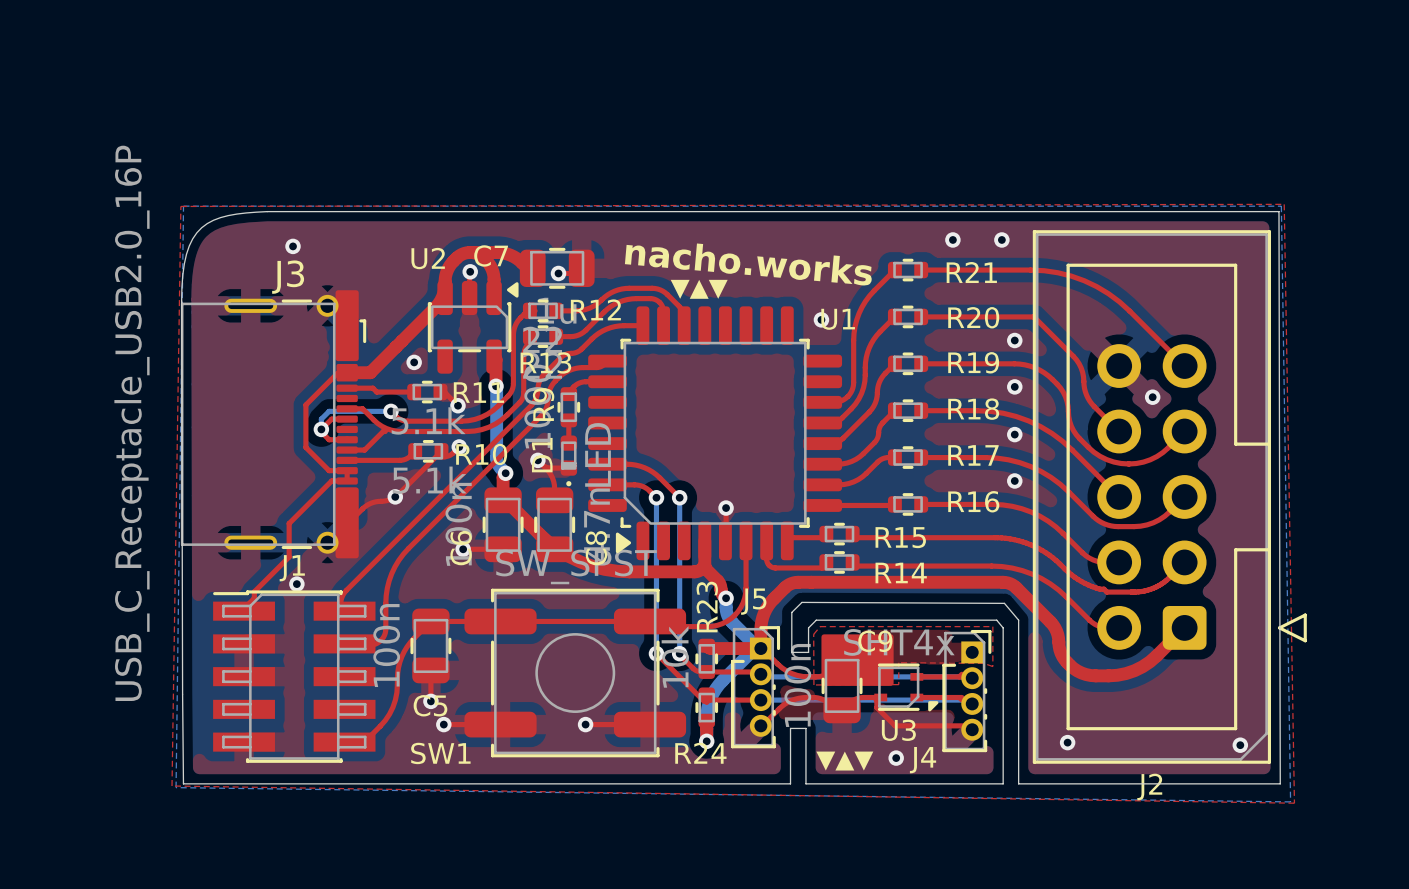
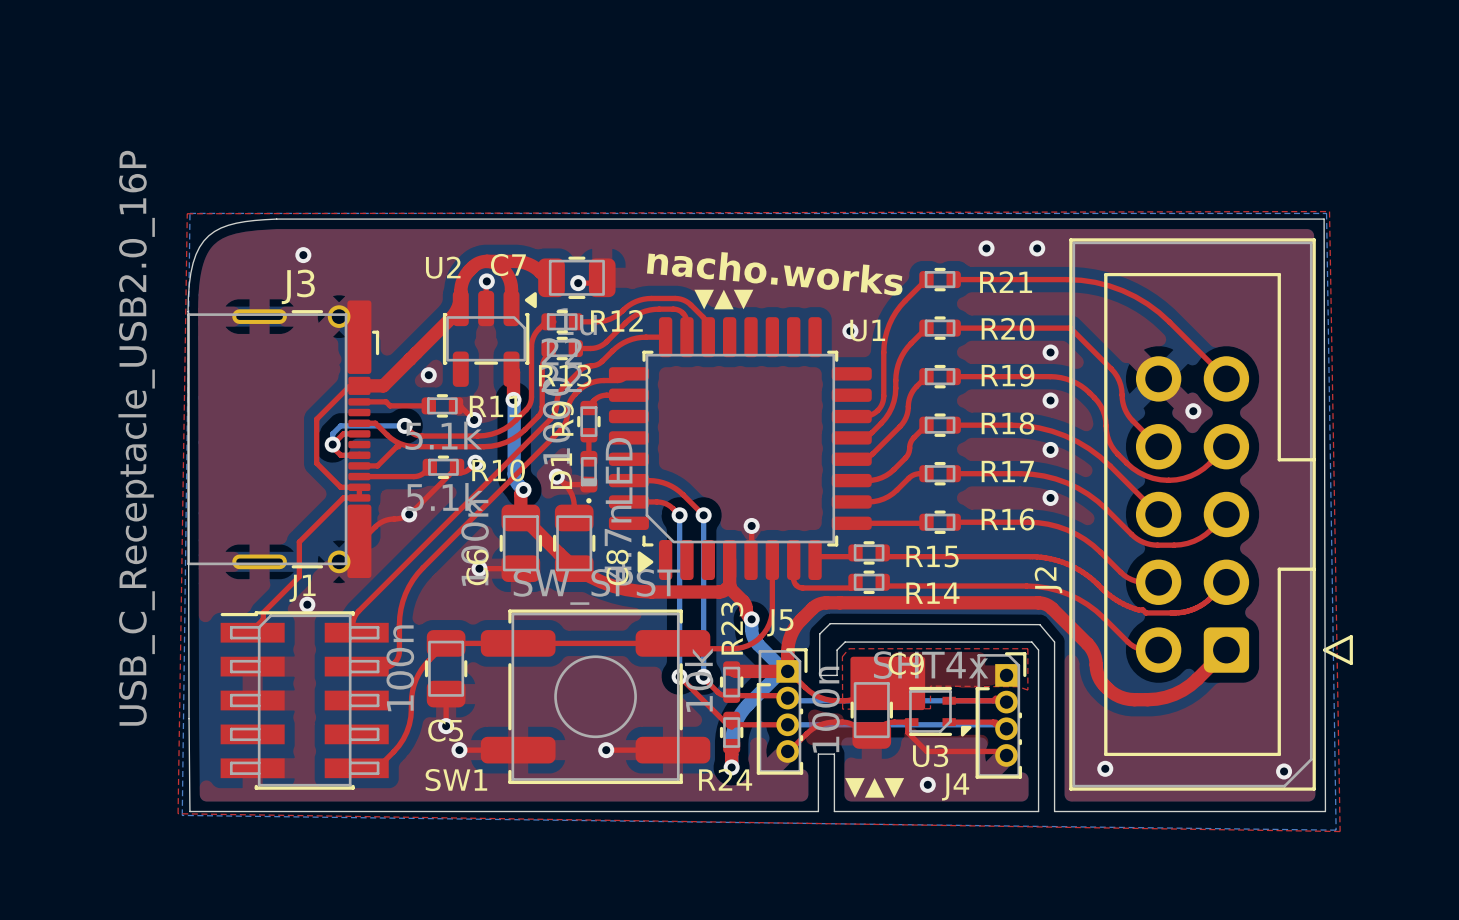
J2 name rotation: 0° (1149, 787) -> 90° counterclockwise (1048, 580)
J2 name position: J2 (1149, 787) -> J2 (1048, 580)

